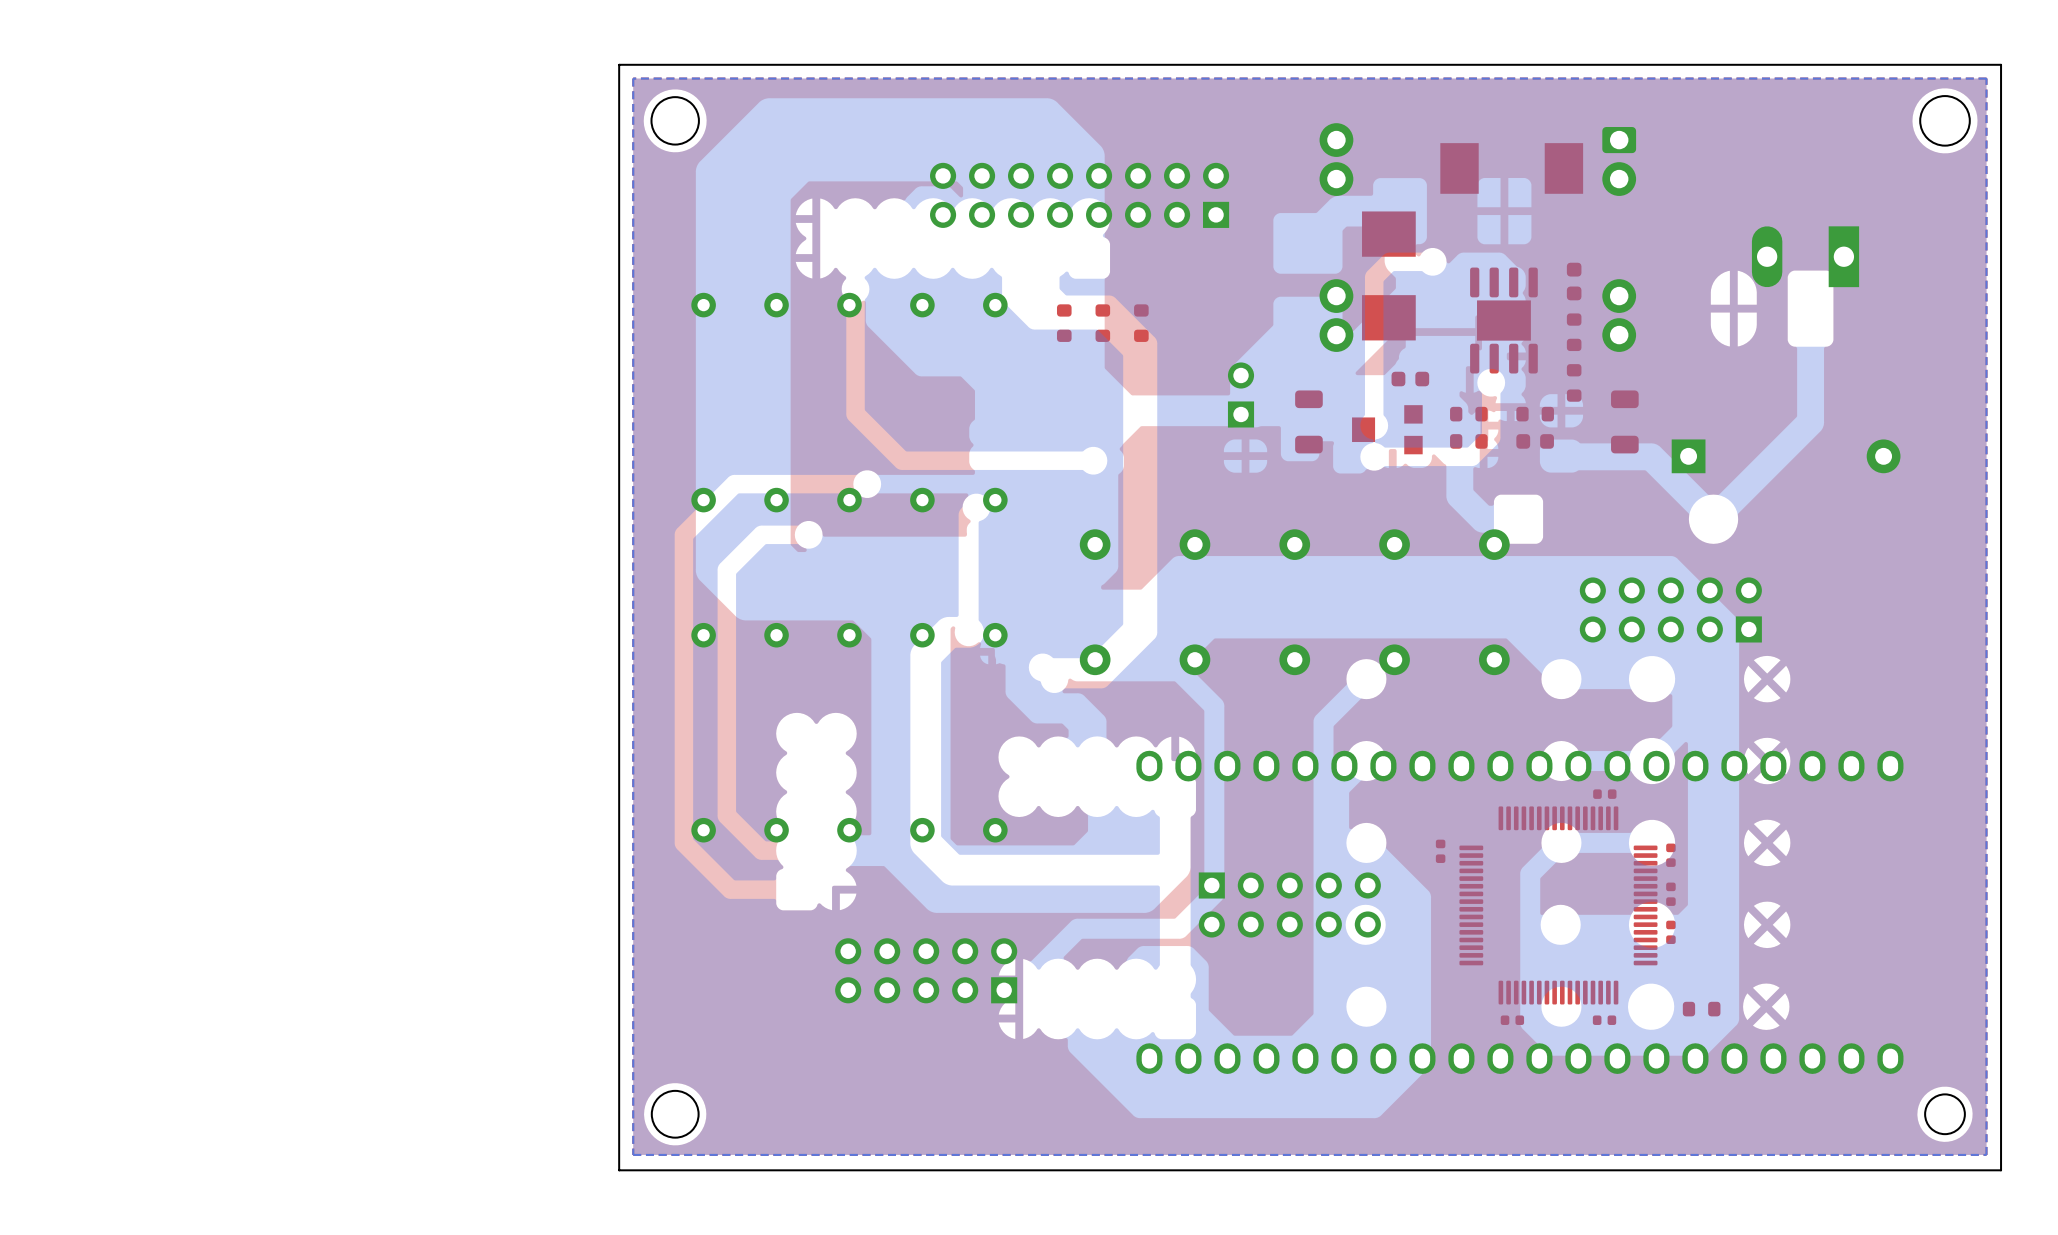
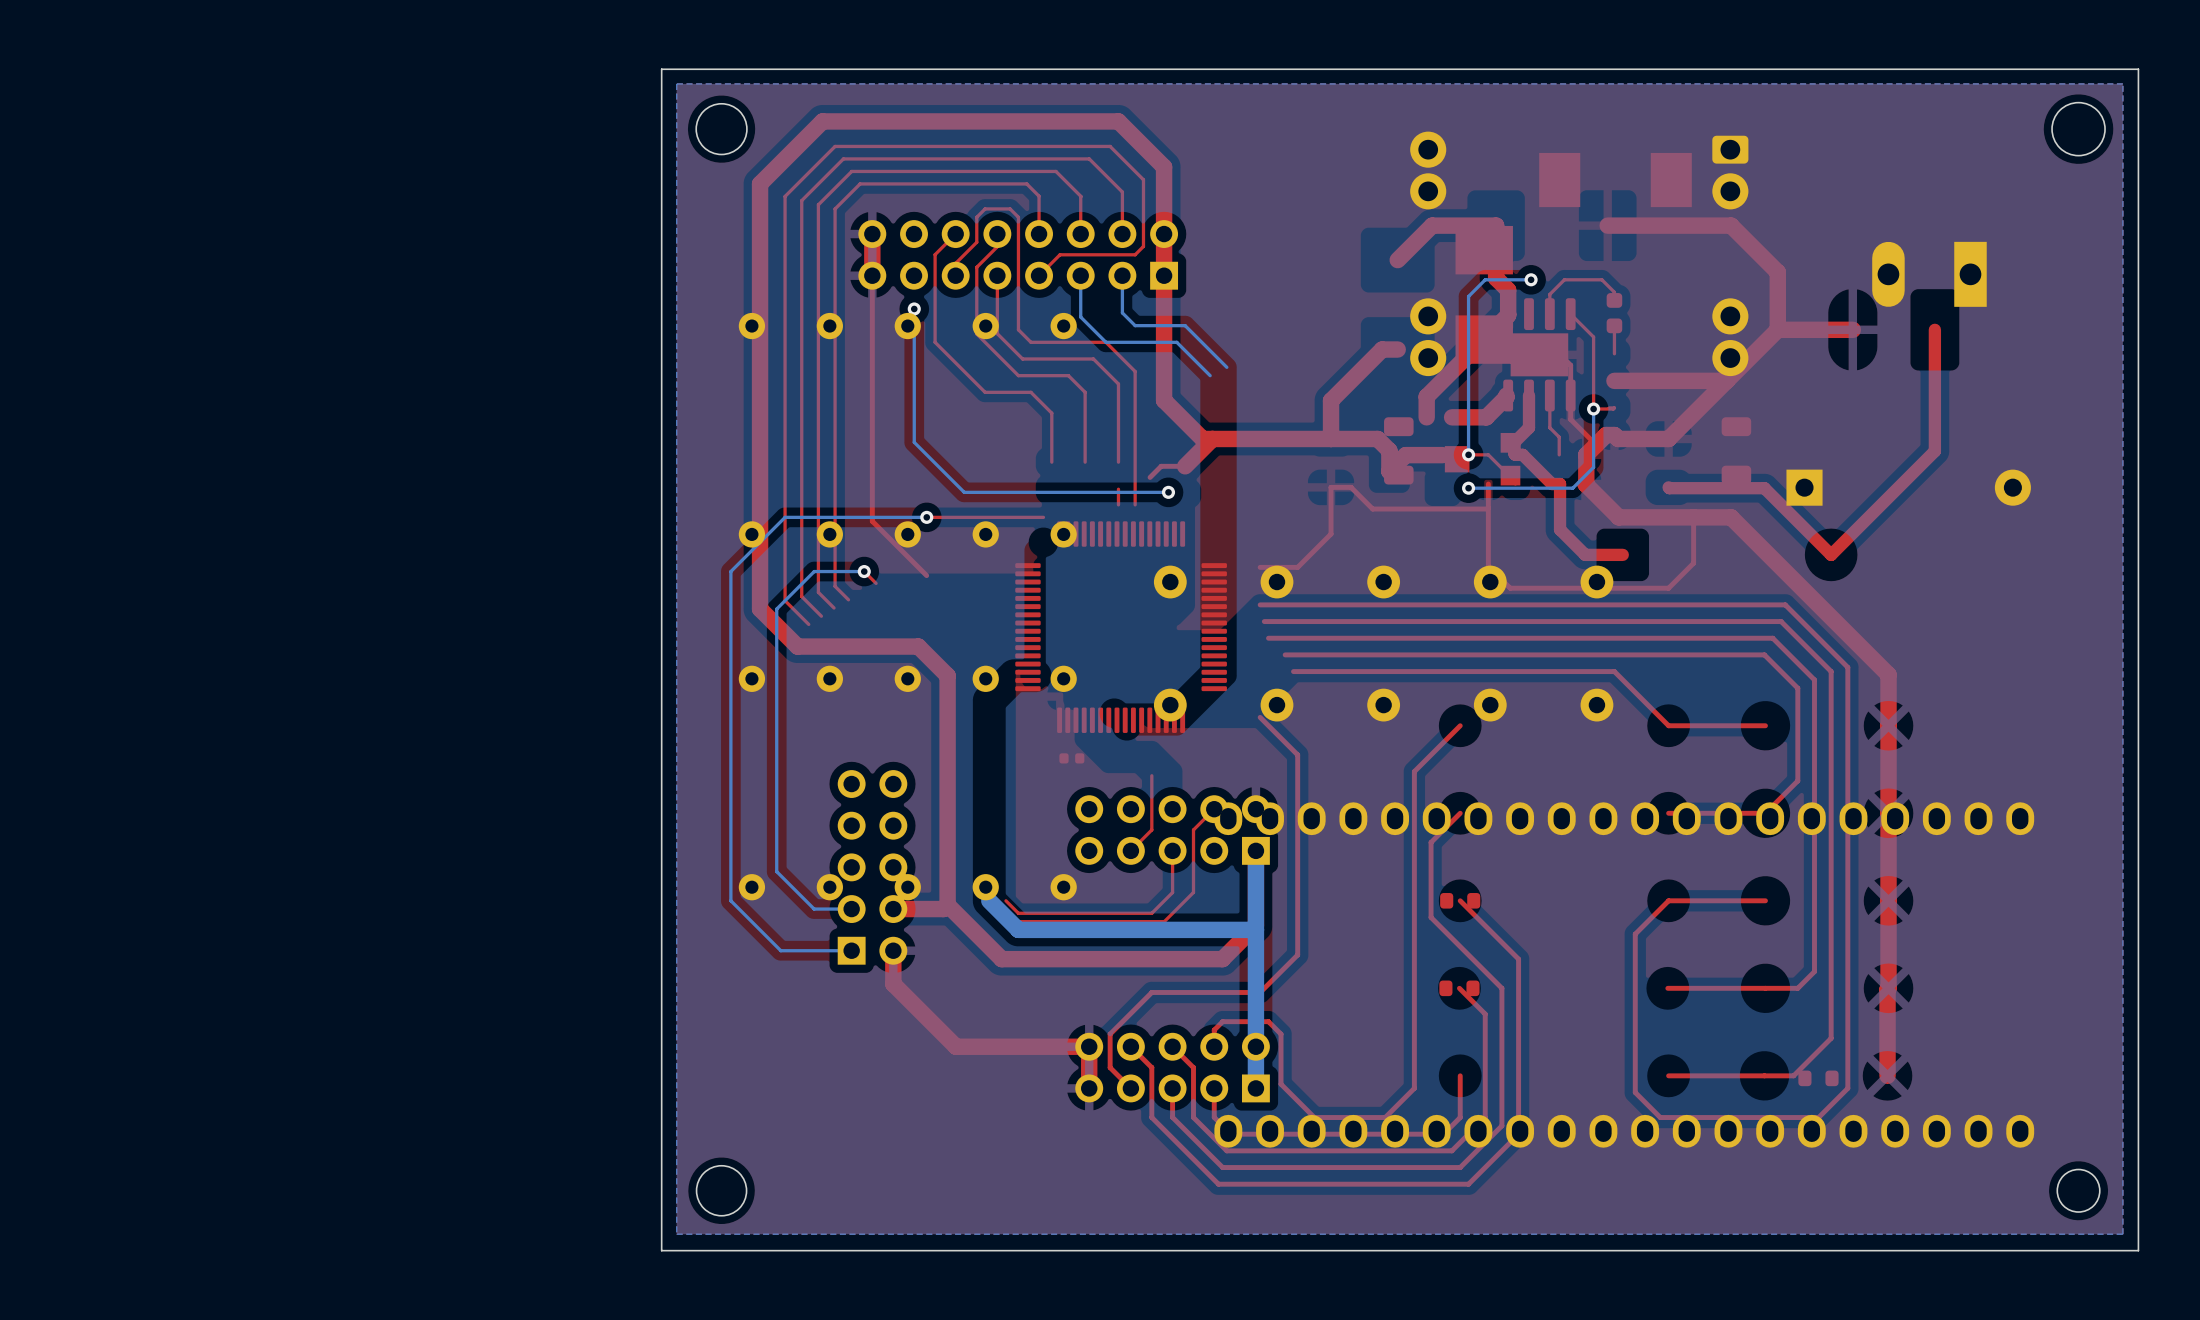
part position: (1079, 195) -> (1018, 254)
top track: none -> (1607, 225) (1731, 225) (1777, 272) (1777, 329)
top track: none -> (872, 234) (872, 521) (926, 575)
top track: none -> (955, 234) (935, 254) (935, 342) (985, 392) (1030, 392) (1051, 413) (1051, 462)
top track: none -> (997, 234) (997, 246) (976, 267) (976, 333) (1018, 375) (1068, 375) (1085, 392) (1085, 462)
top track: none -> (1039, 234) (1039, 196) (1026, 183) (860, 183) (835, 208) (835, 586) (848, 599)
top track: none -> (1080, 234) (1080, 196) (1055, 171) (851, 171) (818, 204) (818, 592) (834, 608)
top track: none -> (1122, 234) (1122, 192) (1089, 158) (843, 158) (801, 200) (801, 596) (821, 616)
top track: none -> (1397, 260) (1432, 225) (1496, 225) (1496, 278) (1508, 290) (1508, 315) (1426, 396) (1426, 417)
top track: none -> (955, 275) (955, 263) (976, 242) (976, 217) (985, 208) (1010, 208) (1018, 217) (1018, 329) (1030, 342) (1105, 342) (1135, 371) (1135, 504)
top track: none -> (997, 275) (997, 333) (1022, 358) (1093, 358) (1118, 384) (1118, 462)
top track: none -> (1039, 275) (1059, 254) (1135, 254) (1143, 246) (1143, 179) (1110, 146) (835, 146) (785, 196) (785, 600) (808, 624)
bottom track: none -> (1080, 275) (1080, 317) (1105, 342) (1176, 342) (1210, 375)
bottom track: none -> (1122, 275) (1122, 312) (1135, 325) (1185, 325) (1226, 367)
bottom track: none -> (1531, 279) (1485, 279) (1468, 296) (1468, 454)
via: none -> (1531, 279)
top track: none -> (1614, 300) (1614, 292) (1601, 279) (1564, 279) (1549, 294) (1549, 314)
part position: (1574, 281) -> (1614, 313)
bottom track: none -> (914, 308) (914, 442) (964, 492) (1168, 492)
via: none -> (914, 308)
top track: none -> (1570, 314) (1593, 337) (1593, 409) (1614, 407) (1609, 407)
top track: none -> (1614, 325) (1614, 353)
top track: none -> (1777, 329) (1668, 438) (1618, 438) (1614, 435) (1606, 435) (1586, 454) (1585, 484) (1618, 517) (1731, 517) (1888, 674) (1887, 1075)
top track: none -> (1852, 329) (1777, 329)
top track: none -> (1934, 329) (1934, 451) (1831, 554) (1764, 488) (1668, 487)
part position: (1503, 320) -> (1539, 354)
part: (1064, 323) -> none
part: (1102, 323) -> none
part: (1141, 323) -> none
top track: none -> (1397, 349) (1382, 349) (1331, 400) (1331, 438)
top track: none -> (1539, 354) (1560, 354) (1570, 365) (1570, 419) (1596, 444)
part: (1574, 332) -> none
top track: none -> (1726, 380) (1614, 380)
top track: none -> (1506, 395) (1486, 417) (1452, 417)
top track: none -> (1529, 395) (1529, 427) (1514, 442) (1514, 453) (1522, 454) (1551, 484) (1560, 484) (1560, 529) (1585, 554) (1622, 554)
top track: none -> (1549, 395) (1549, 427) (1559, 437) (1559, 454)
part: (1410, 379) -> none
bottom track: none -> (1593, 409) (1593, 467) (1572, 488) (1468, 488)
via: none -> (1593, 409)
part: (1574, 382) -> none
part: (1241, 395) -> none
top track: none -> (1212, 438) (1185, 466) (1161, 466) (1150, 477)
part: (1468, 414) -> none
part: (1535, 414) -> none
top track: none -> (1442, 455) (1405, 455) (1389, 471) (1389, 450) (1377, 438) (1202, 438) (1164, 400) (1164, 167) (1118, 121) (822, 121) (760, 183) (760, 609) (797, 646) (918, 646) (947, 675) (947, 904)
top track: none -> (1468, 454) (1488, 454) (1515, 484)
via: none -> (1468, 454)
part: (1468, 441) -> none
part: (1535, 441) -> none
top track: none -> (1488, 484) (1488, 566) (1510, 588) (1668, 588) (1693, 563) (1693, 517)
via: none -> (1468, 488)
top track: none -> (1118, 489) (1118, 504)
via: none -> (1168, 492)
top track: none -> (1488, 508) (1372, 509) (1351, 487) (1331, 487) (1331, 534) (1297, 567) (1260, 567)
bottom track: none -> (926, 517) (785, 517) (730, 571) (730, 900) (780, 950) (851, 950)
via: none -> (926, 517)
top track: none -> (1043, 517) (926, 517)
top track: none -> (864, 571) (876, 583)
bottom track: none -> (864, 571) (814, 571) (776, 609) (776, 871) (814, 909) (851, 909)
via: none -> (864, 571)
top track: none -> (1260, 604) (1785, 604) (1847, 667) (1847, 1088) (1818, 1117) (1660, 1117) (1635, 1092) (1635, 934) (1668, 900) (1765, 900)
top track: none -> (1264, 621) (1781, 621) (1831, 671) (1831, 1038) (1793, 1075) (1668, 1075)
part: none -> (1121, 627)
top track: none -> (1268, 638) (1772, 638) (1814, 679) (1814, 971) (1797, 988) (1667, 988)
part: (1670, 609) -> none
top track: none -> (1285, 654) (1764, 654) (1797, 688) (1797, 780) (1765, 813) (1668, 813)
top track: none -> (1293, 671) (1614, 671) (1668, 725) (1765, 725)
top track: none -> (1260, 717) (1297, 754) (1297, 954) (1260, 992) (1151, 992) (1110, 1034) (1110, 1067) (1130, 1088)
top track: none -> (1460, 725) (1414, 771) (1414, 1088) (1385, 1117) (1314, 1117) (1281, 1084) (1281, 1034) (1268, 1021) (1222, 1021) (1214, 1030) (1214, 1046)
part: none -> (1071, 758)
top track: none -> (1151, 775) (1151, 829) (1130, 850)
top track: none -> (1214, 809) (1193, 829) (1193, 892) (1164, 921) (1014, 921) (997, 904)
top track: none -> (1460, 813) (1431, 842) (1431, 917) (1501, 988) (1501, 1125) (1460, 1167) (1222, 1167) (1172, 1117) (1172, 1088)
part: none -> (1172, 830)
part: (1604, 794) -> none
top track: none -> (1172, 850) (1172, 892) (1151, 913) (1018, 913) (1005, 900)
top track: none -> (1255, 850) (1255, 925) (1222, 959) (1001, 959) (947, 904)
bottom track: none -> (1255, 850) (1255, 1088)
part: none -> (872, 867)
bottom track: none -> (989, 900) (1018, 929) (1255, 929)
top track: none -> (1460, 900) (1518, 959) (1518, 1134) (1468, 1184) (1218, 1184) (1151, 1117) (1151, 1067)
part: none -> (1460, 900)
top track: none -> (947, 904) (943, 909) (893, 909)
part: (1440, 851) -> none
part: (1670, 855) -> none
top track: none -> (893, 950) (893, 984) (956, 1046) (1089, 1046) (1089, 1088)
part: (1670, 894) -> none
part: (1289, 904) -> none
part: (1558, 905) -> none
top track: none -> (1459, 988) (1485, 1014) (1485, 1117) (1451, 1150) (1226, 1150) (1193, 1117) (1193, 1067)
part: none -> (1459, 988)
part: (1670, 932) -> none
part: (926, 970) -> none
top track: none -> (1130, 1046) (1151, 1067)
top track: none -> (1172, 1046) (1193, 1067)
part: none -> (1172, 1067)
top track: none -> (1460, 1075) (1460, 1117) (1443, 1134) (1231, 1134) (1214, 1117) (1214, 1088)
part: (1512, 1020) -> none
part: (1604, 1020) -> none

